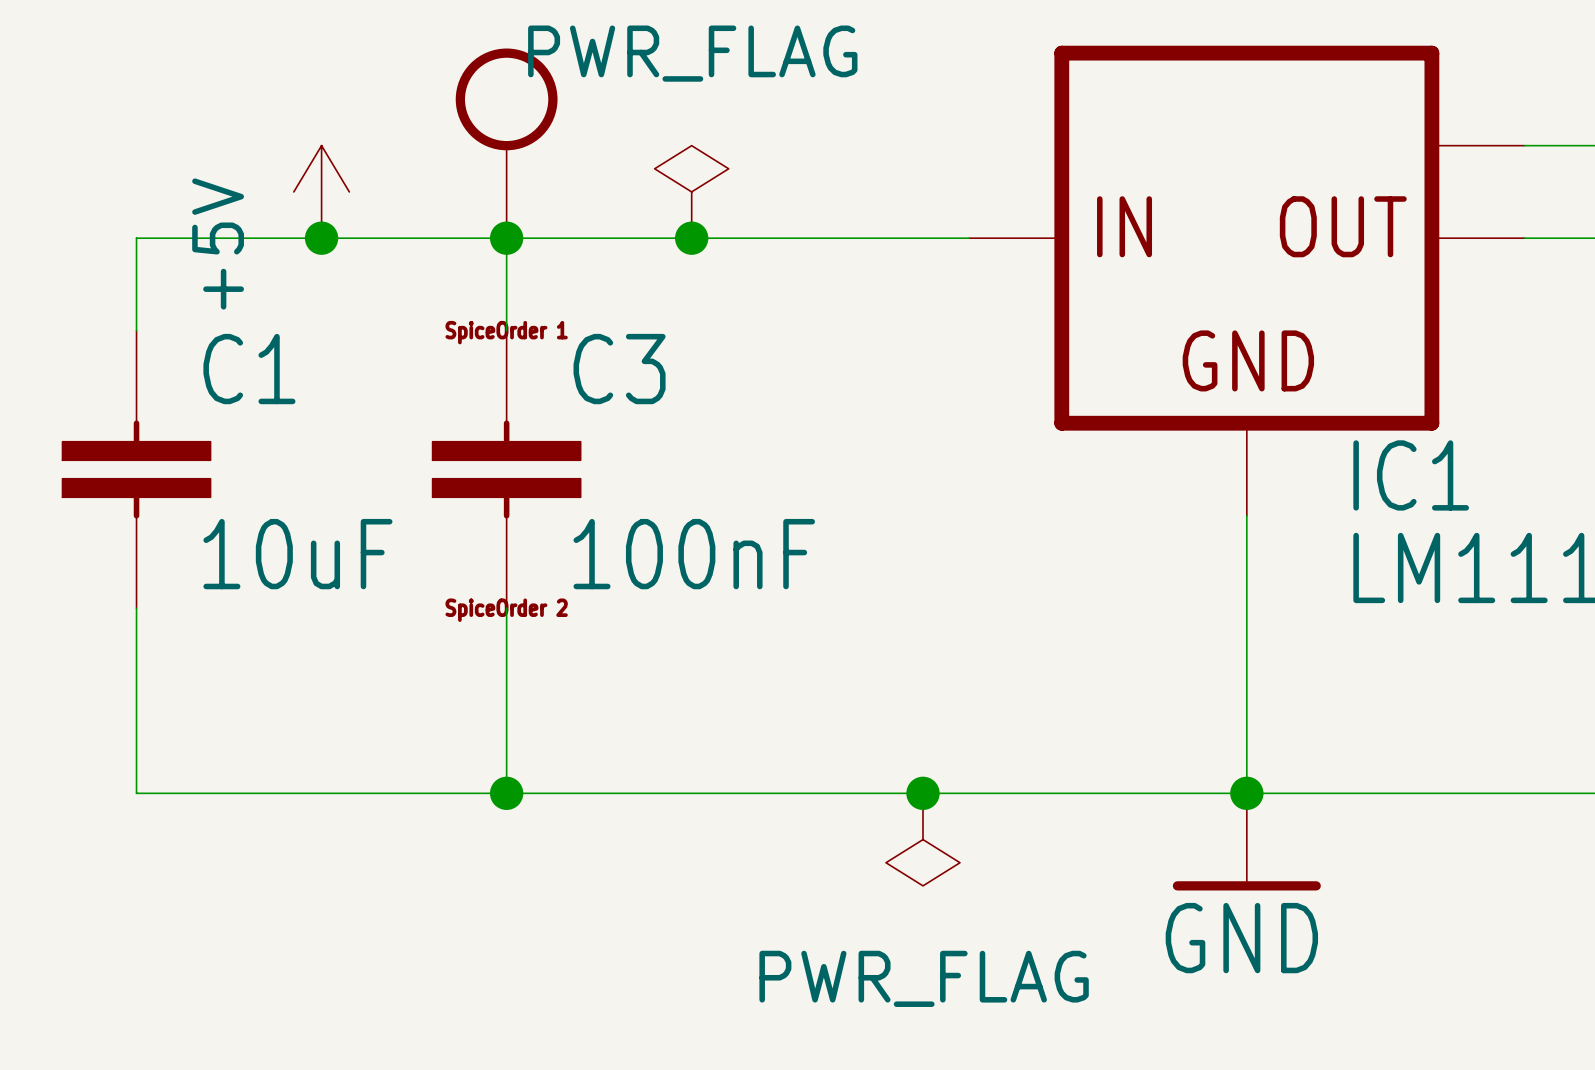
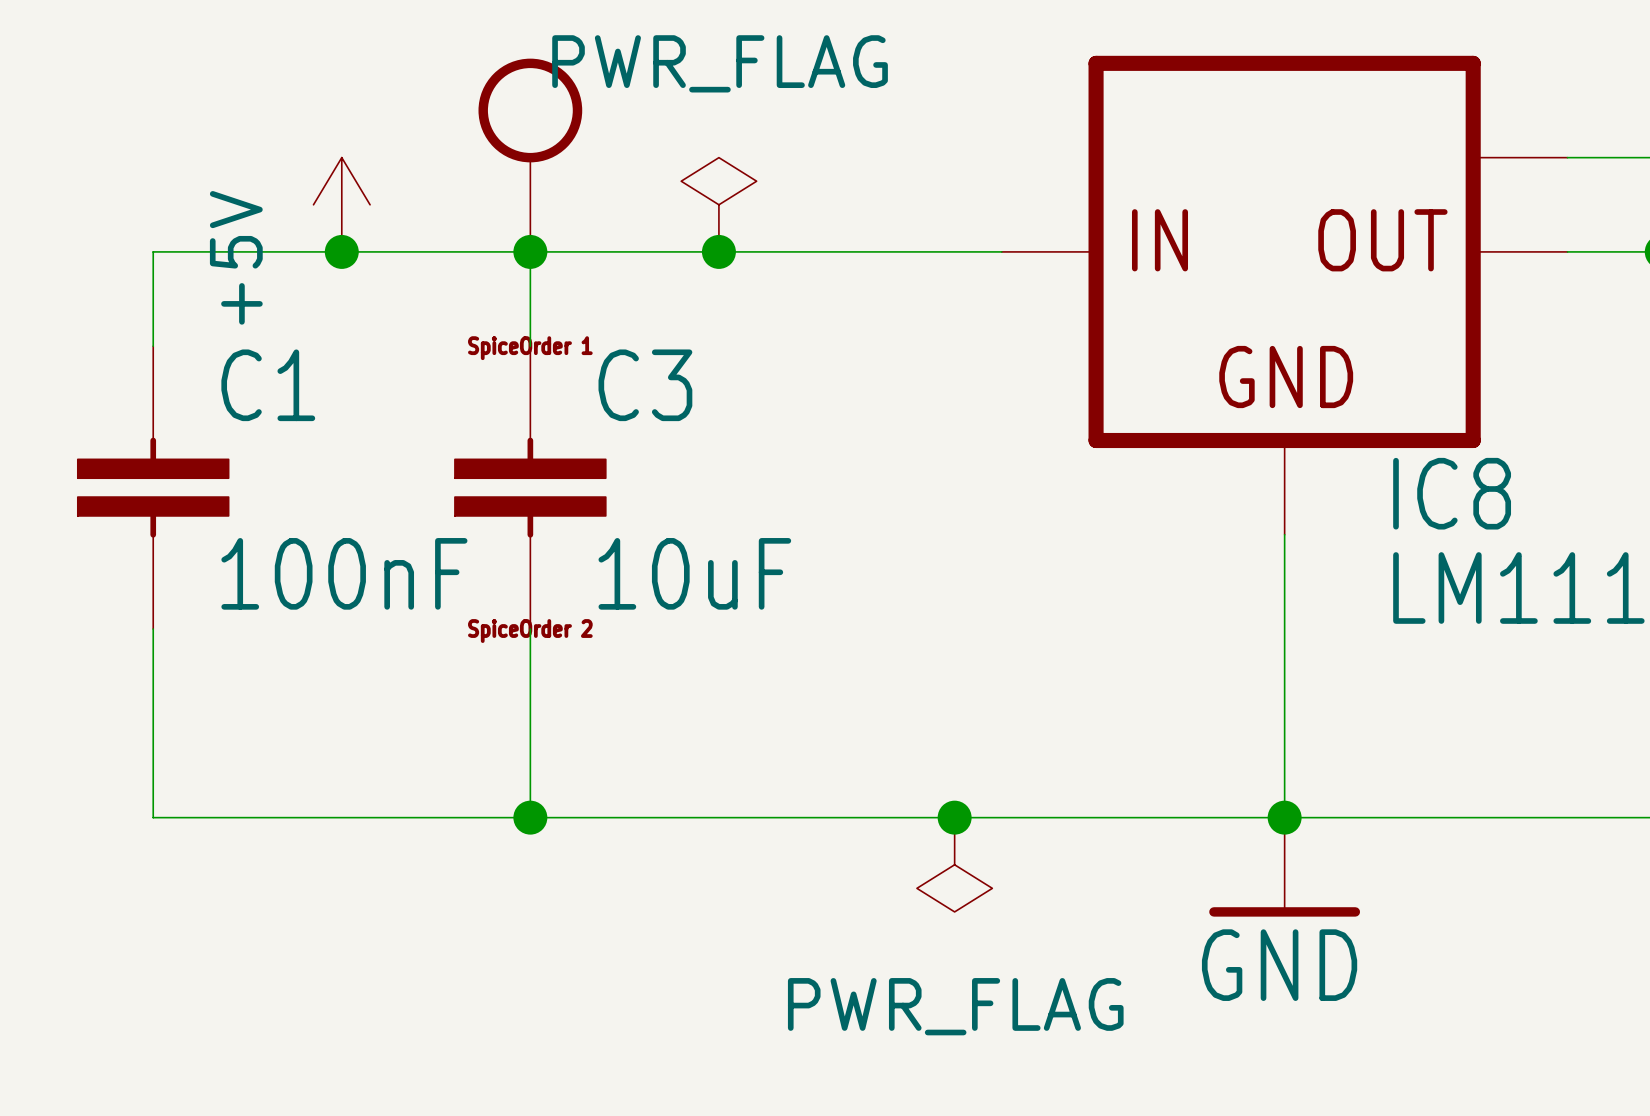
IC1 name: IC1 (1411, 475) -> IC8 (1452, 493)
C1 value: 10uF (297, 554) -> 100nF (344, 573)
C3 value: 100nF (694, 554) -> 10uF (694, 573)

